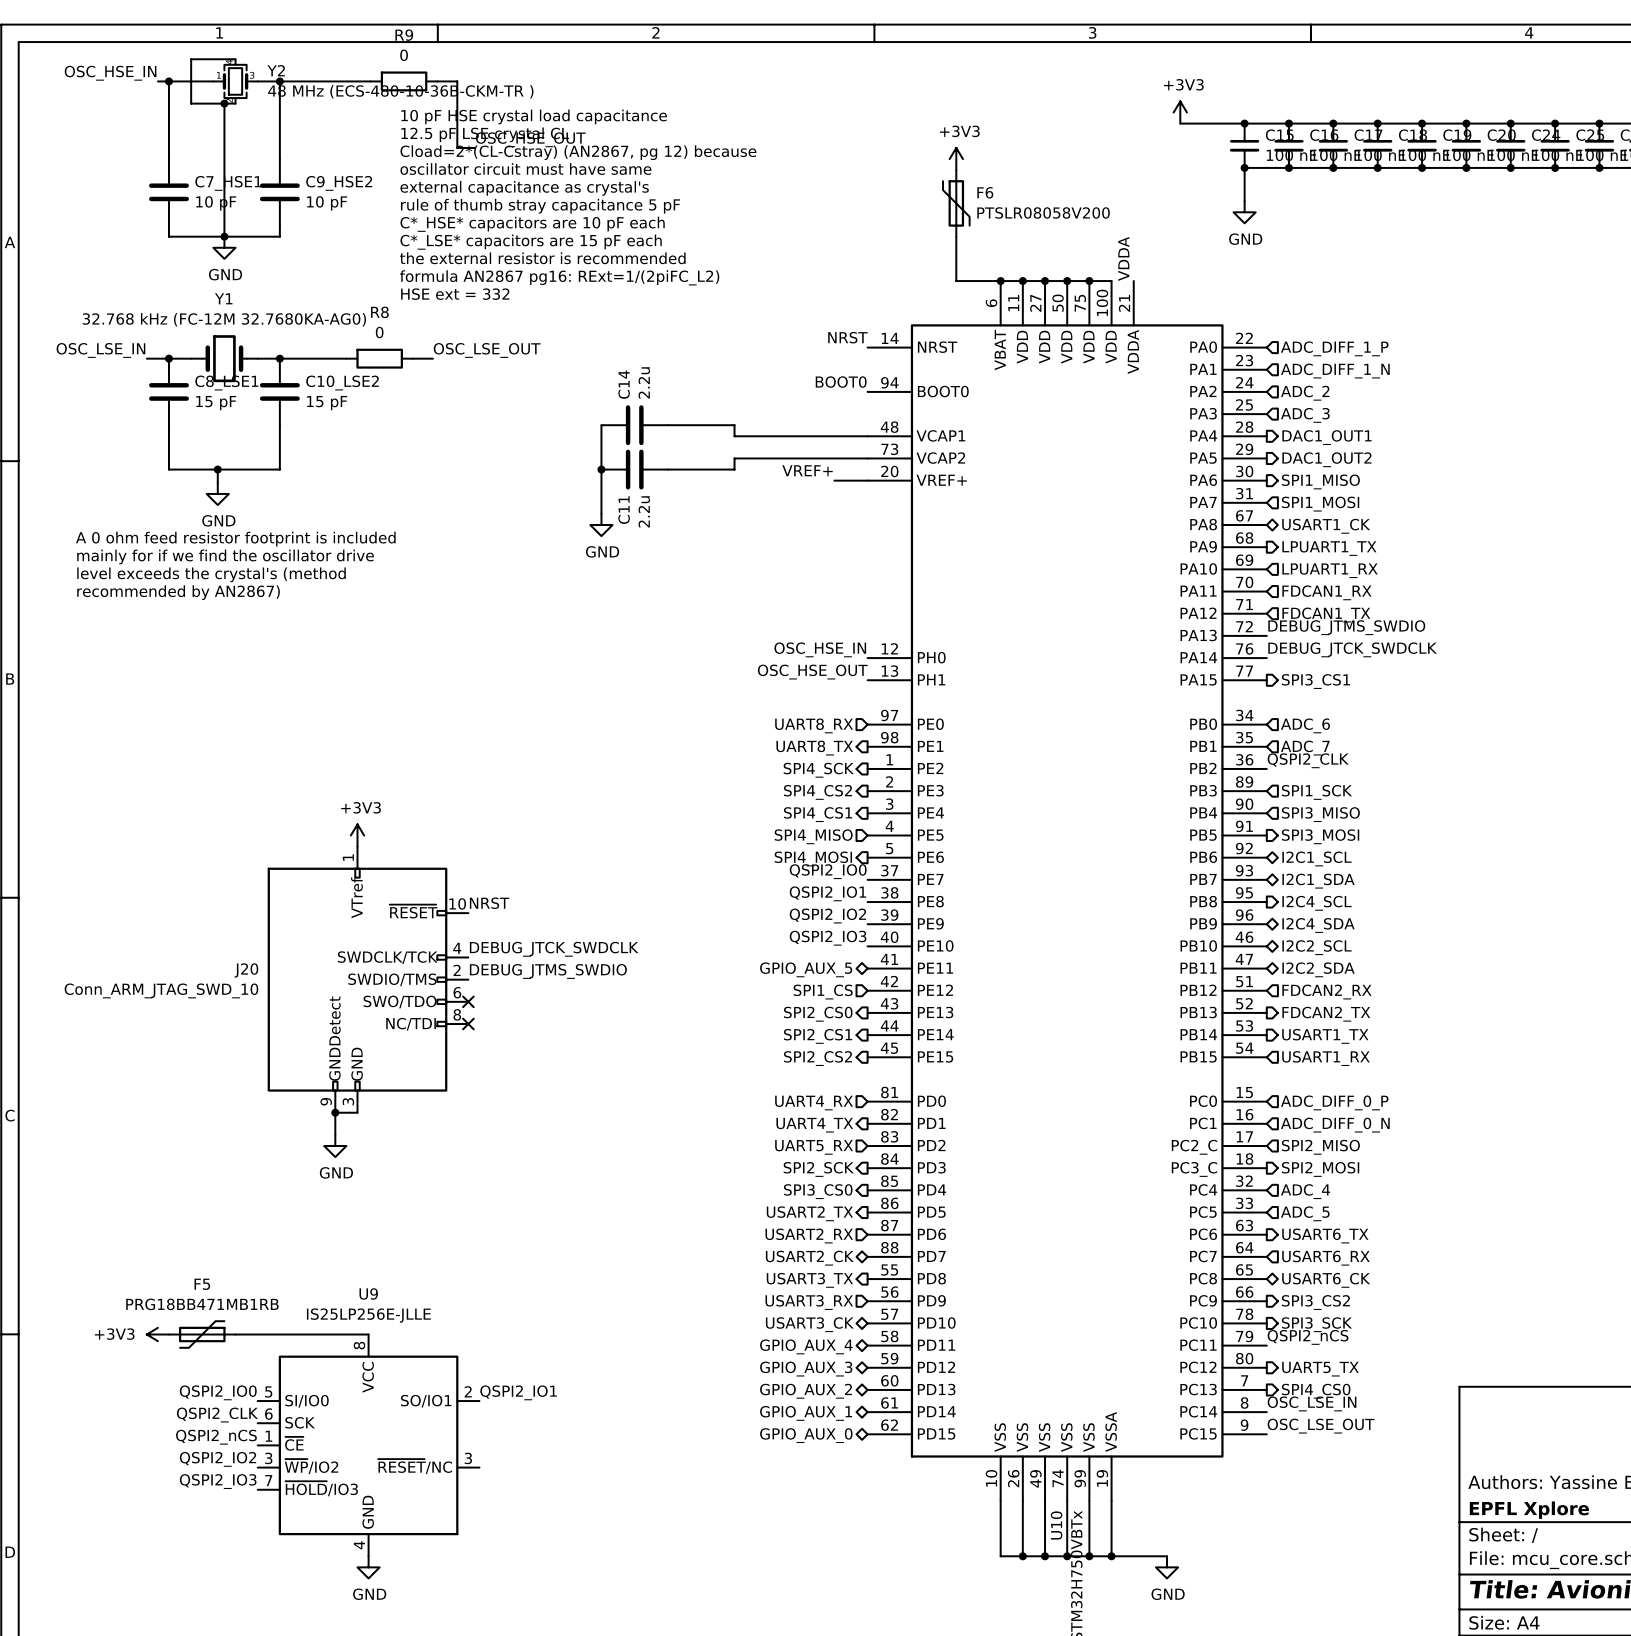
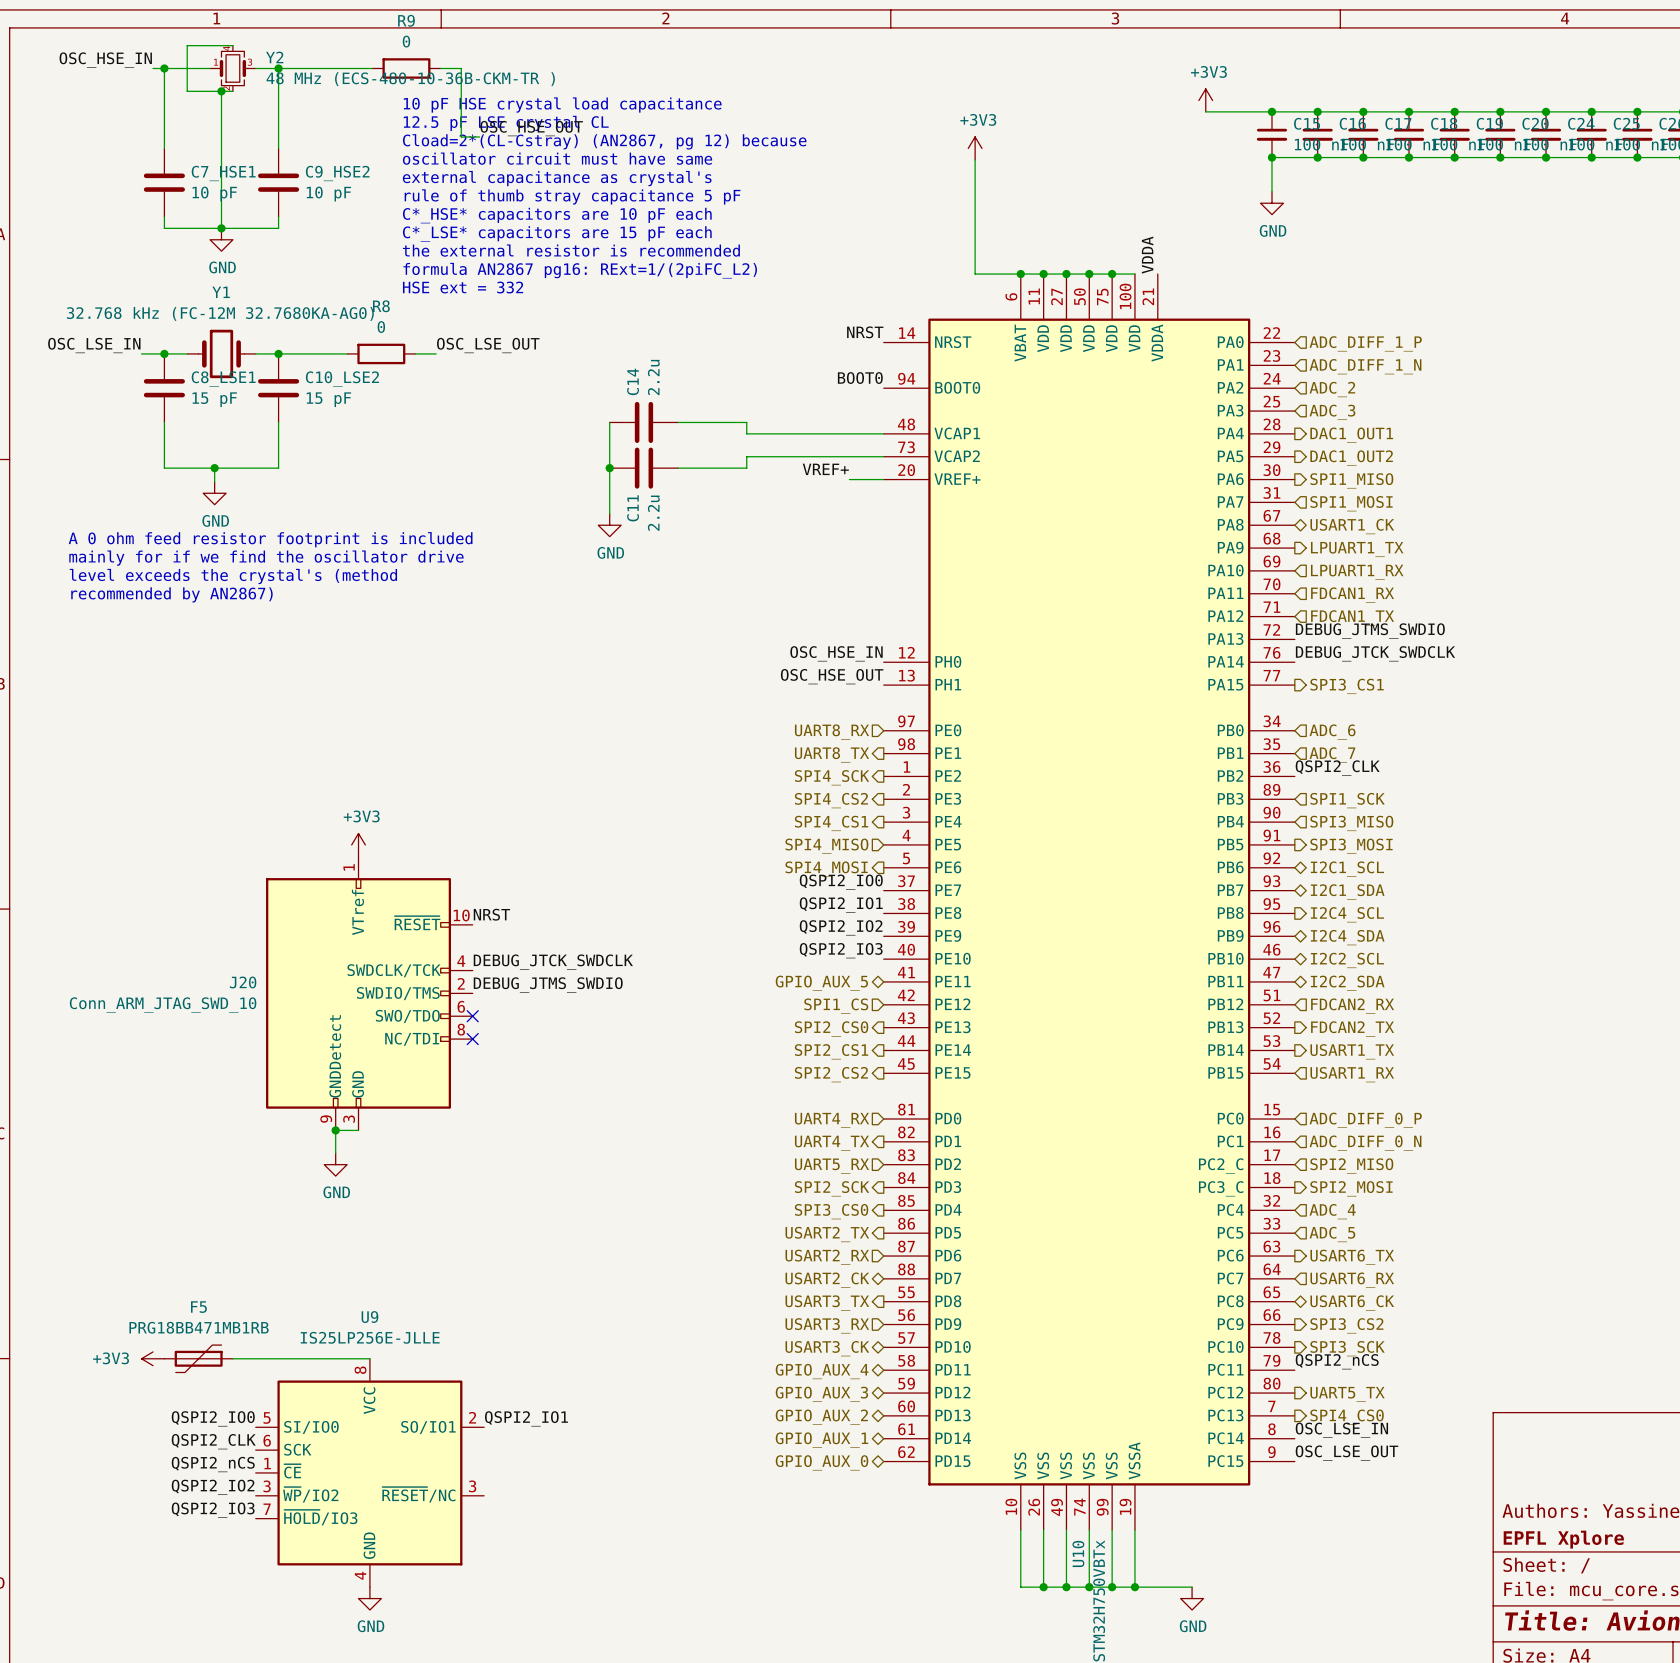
F6: PTSLR08058V200 (956, 203) -> none

